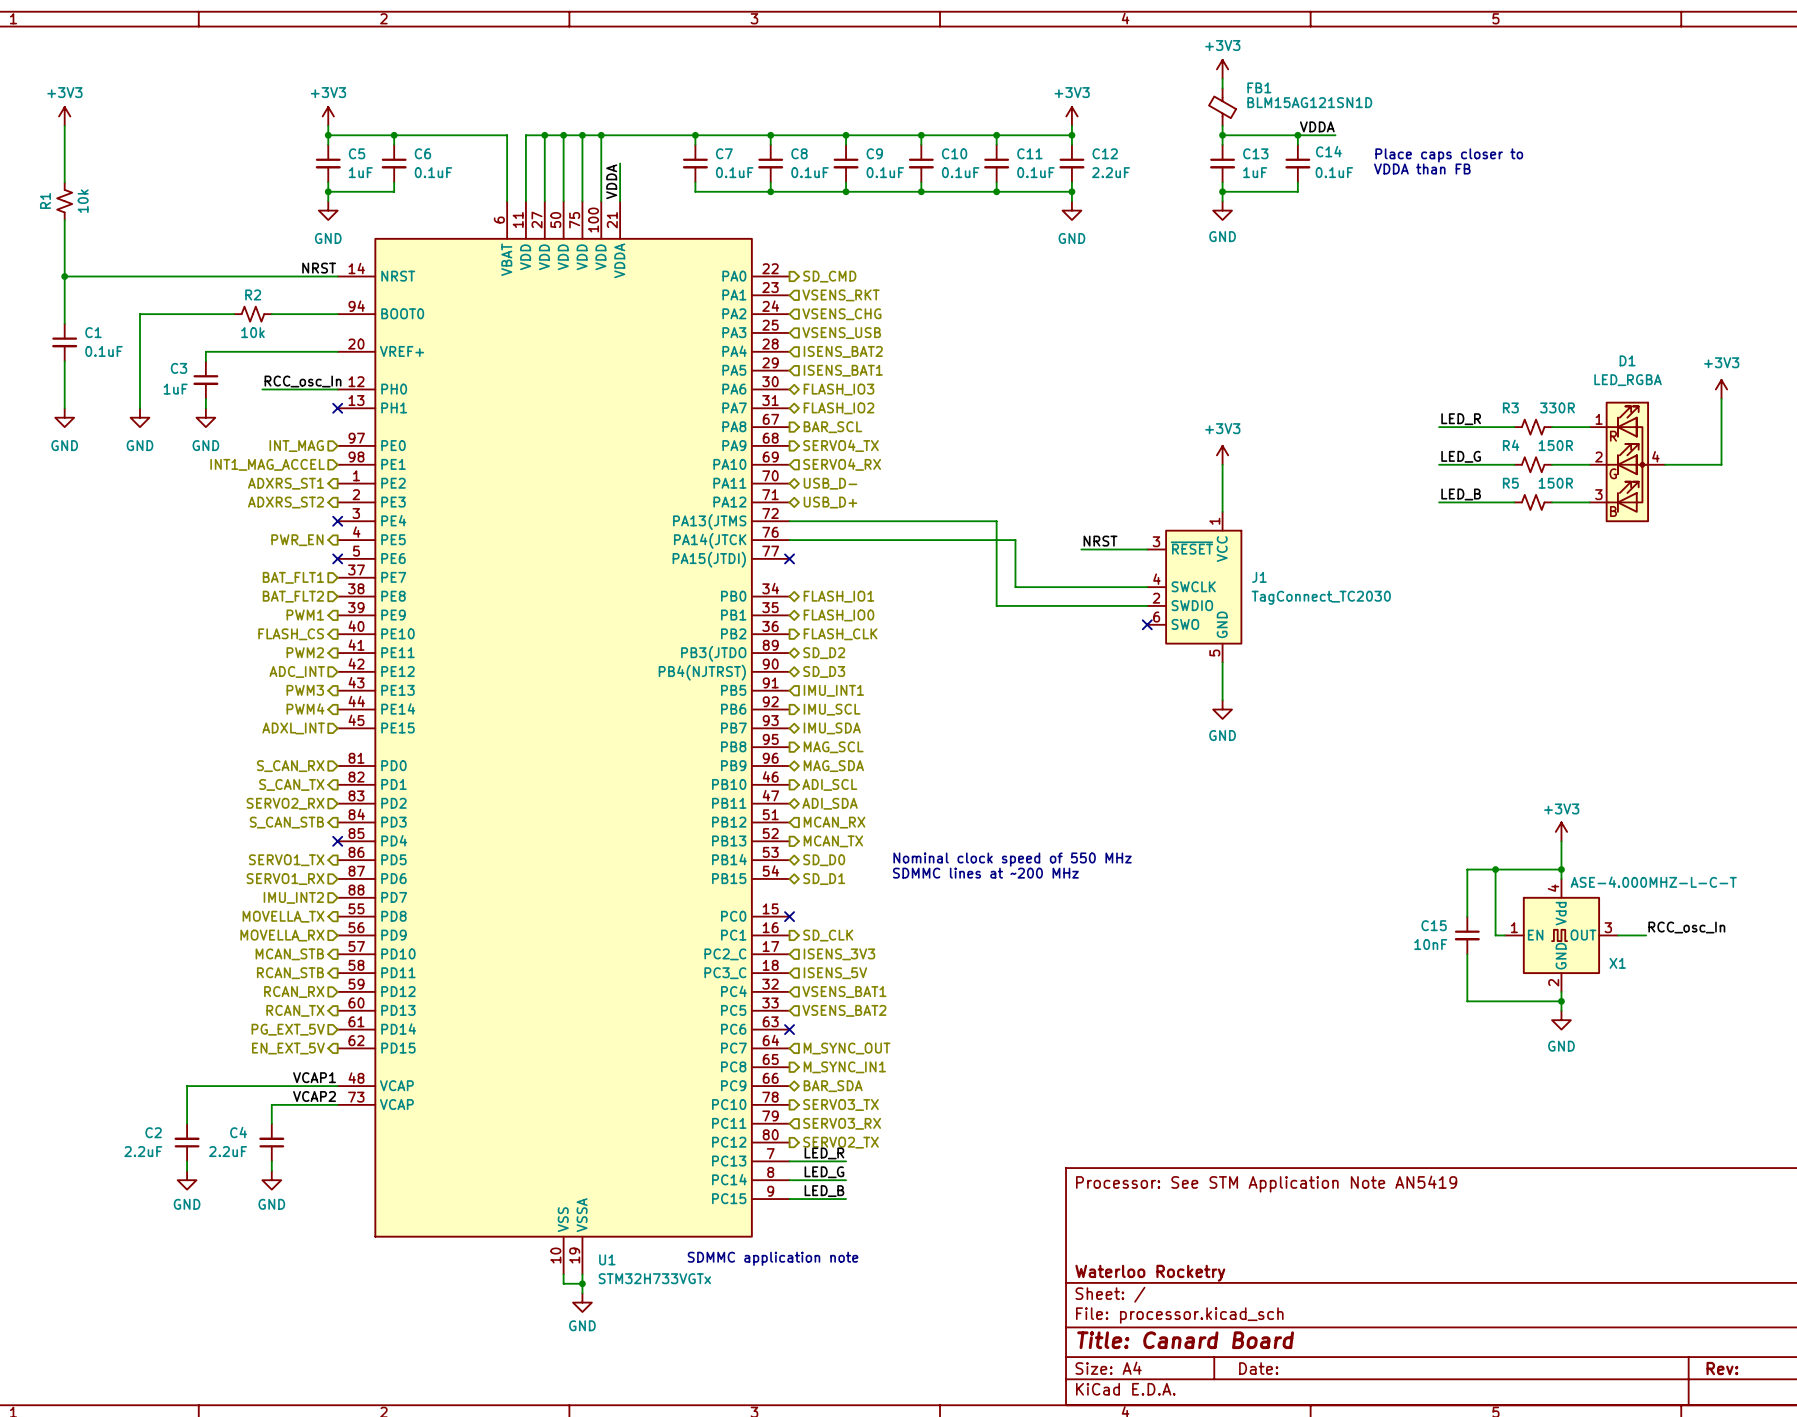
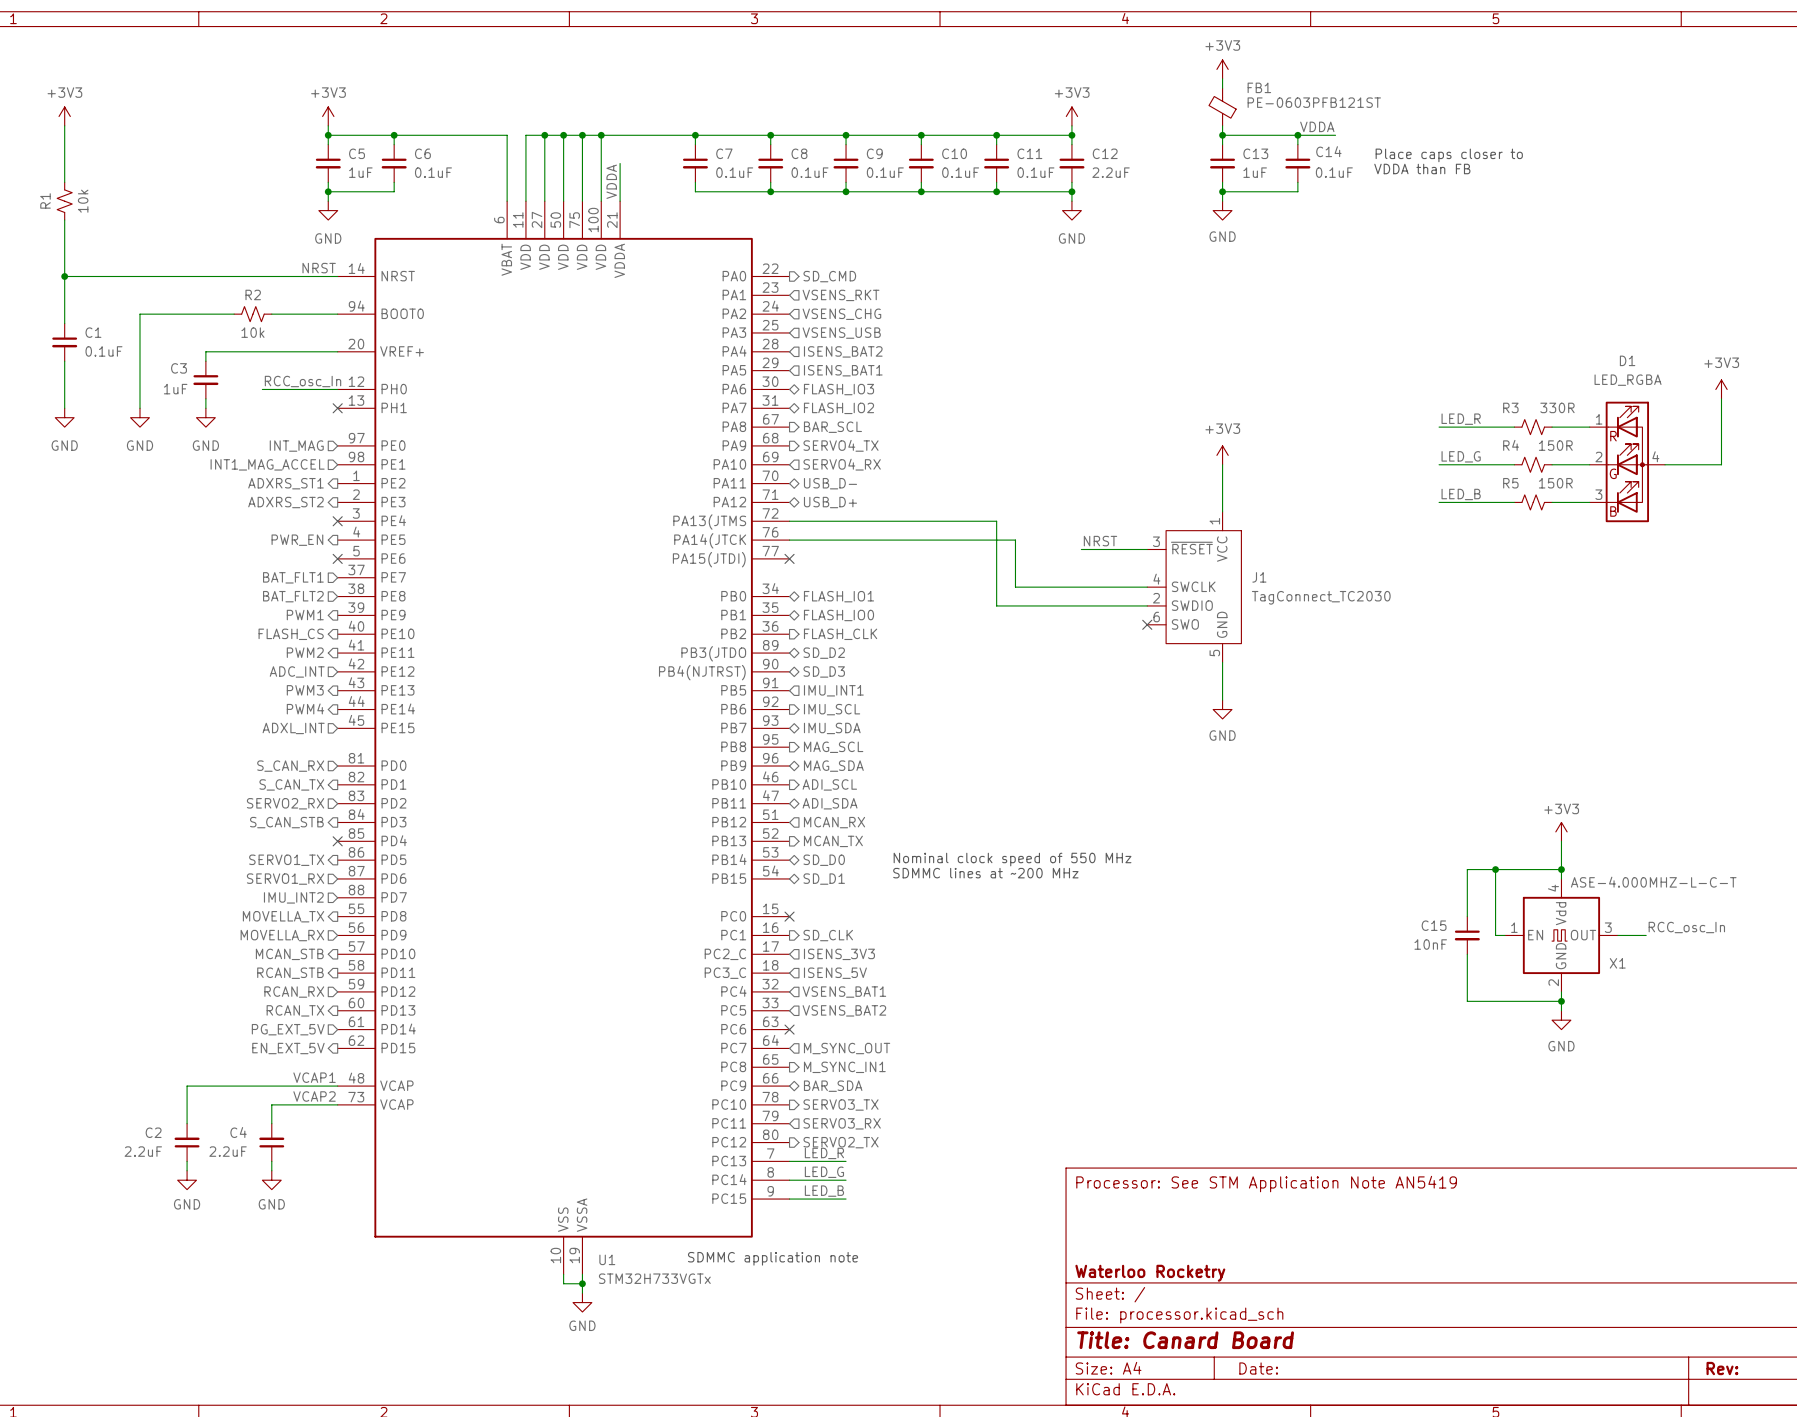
FB1 value: BLM15AG121SN1D (1309, 102) -> PE-0603PFB121ST (1314, 102)

